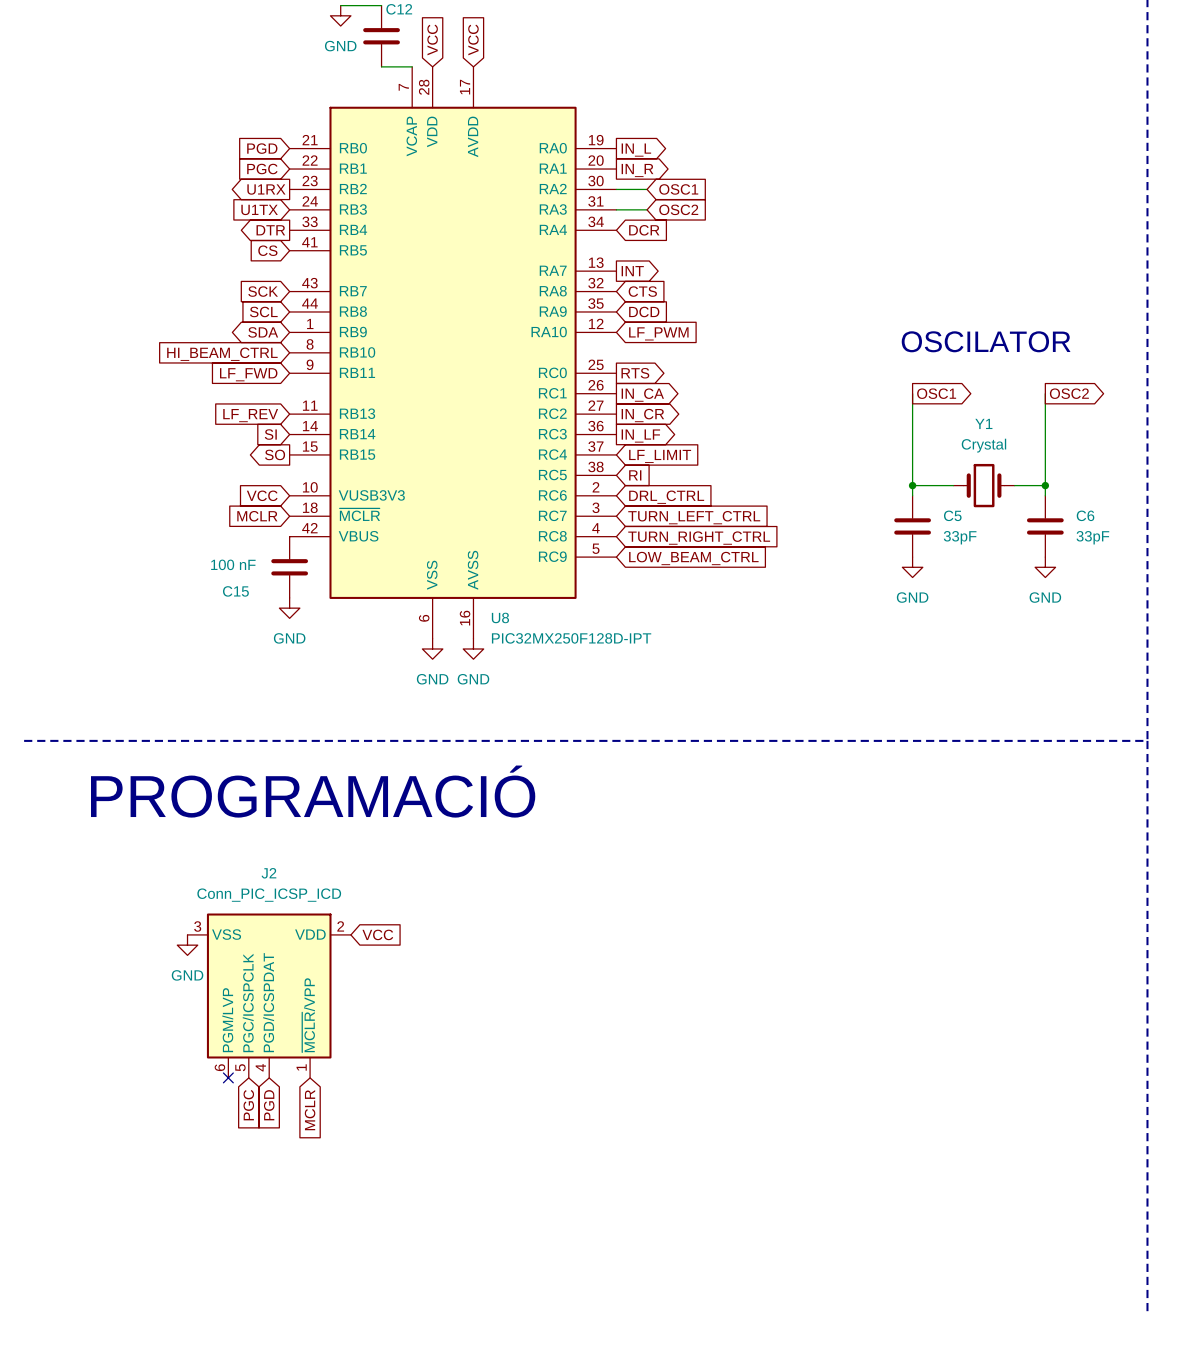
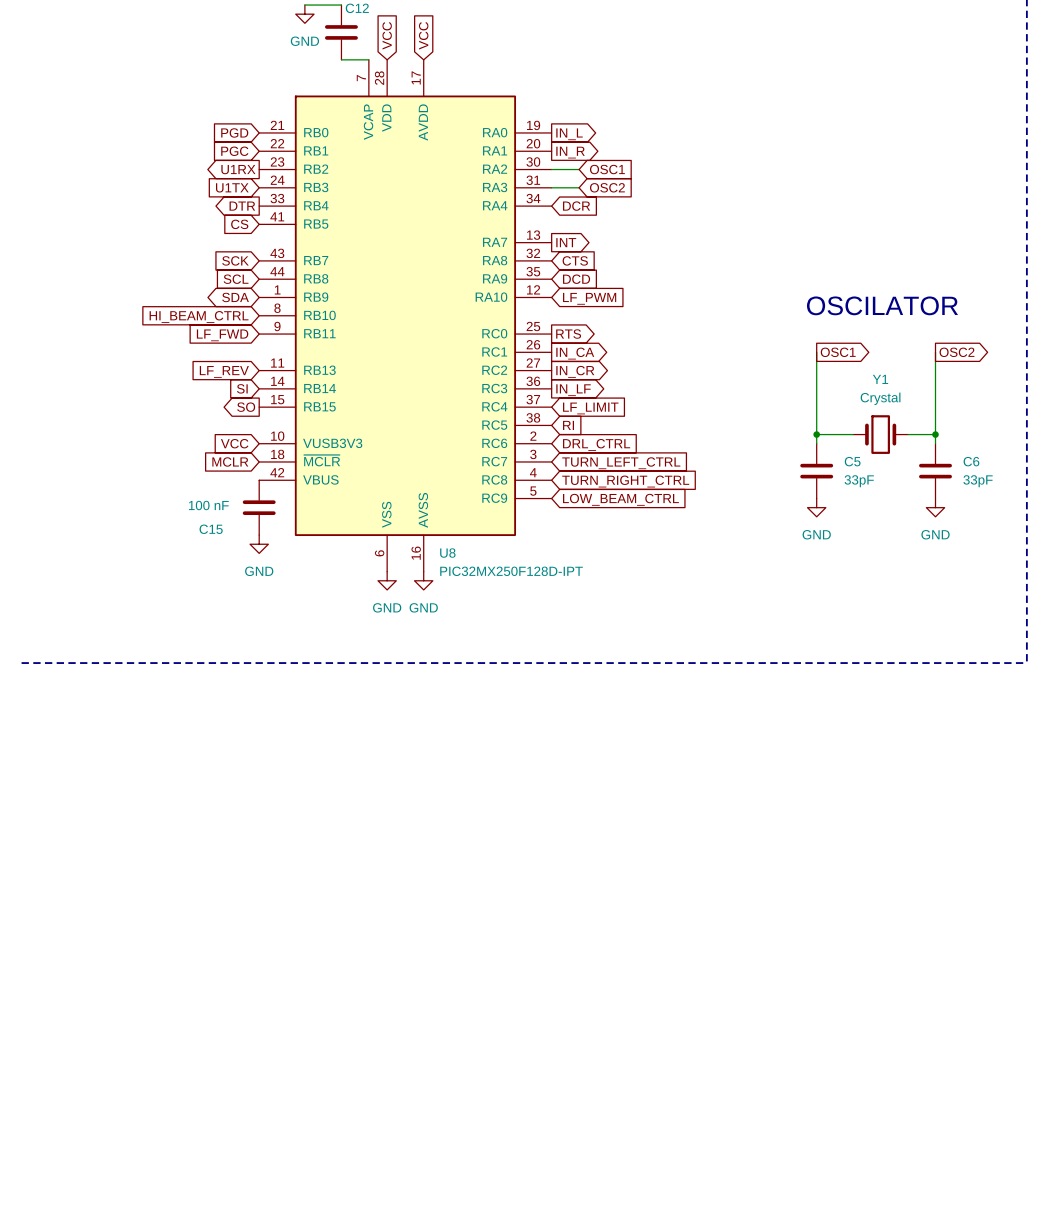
line: (1147, 740) (1147, 1312) -> none
text: PROGRAMACIÓ (313, 791) -> none
global label: VCC (377, 934) -> none
power symbol: GND (187, 945) -> none
J2: Conn_PIC_ICSP_ICD (269, 995) -> none
no-connect mark: (228, 1077) -> none
global label: PGC (248, 1105) -> none
global label: PGD (269, 1105) -> none
global label: MCLR (310, 1110) -> none

